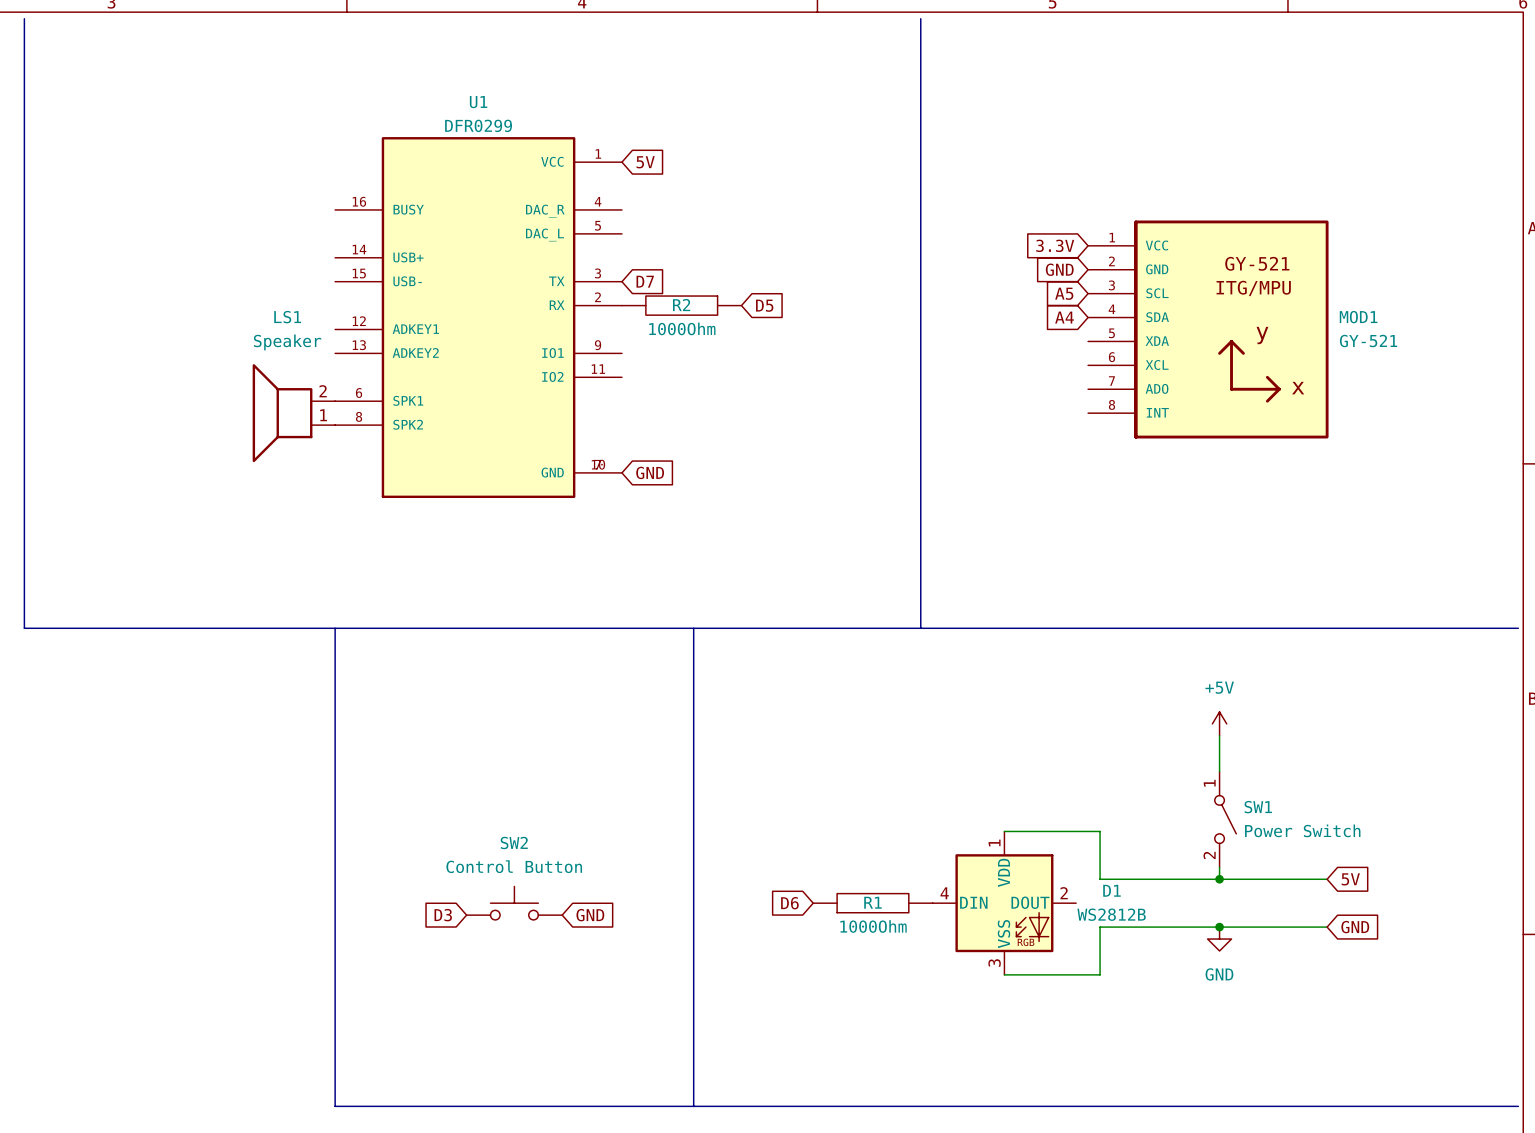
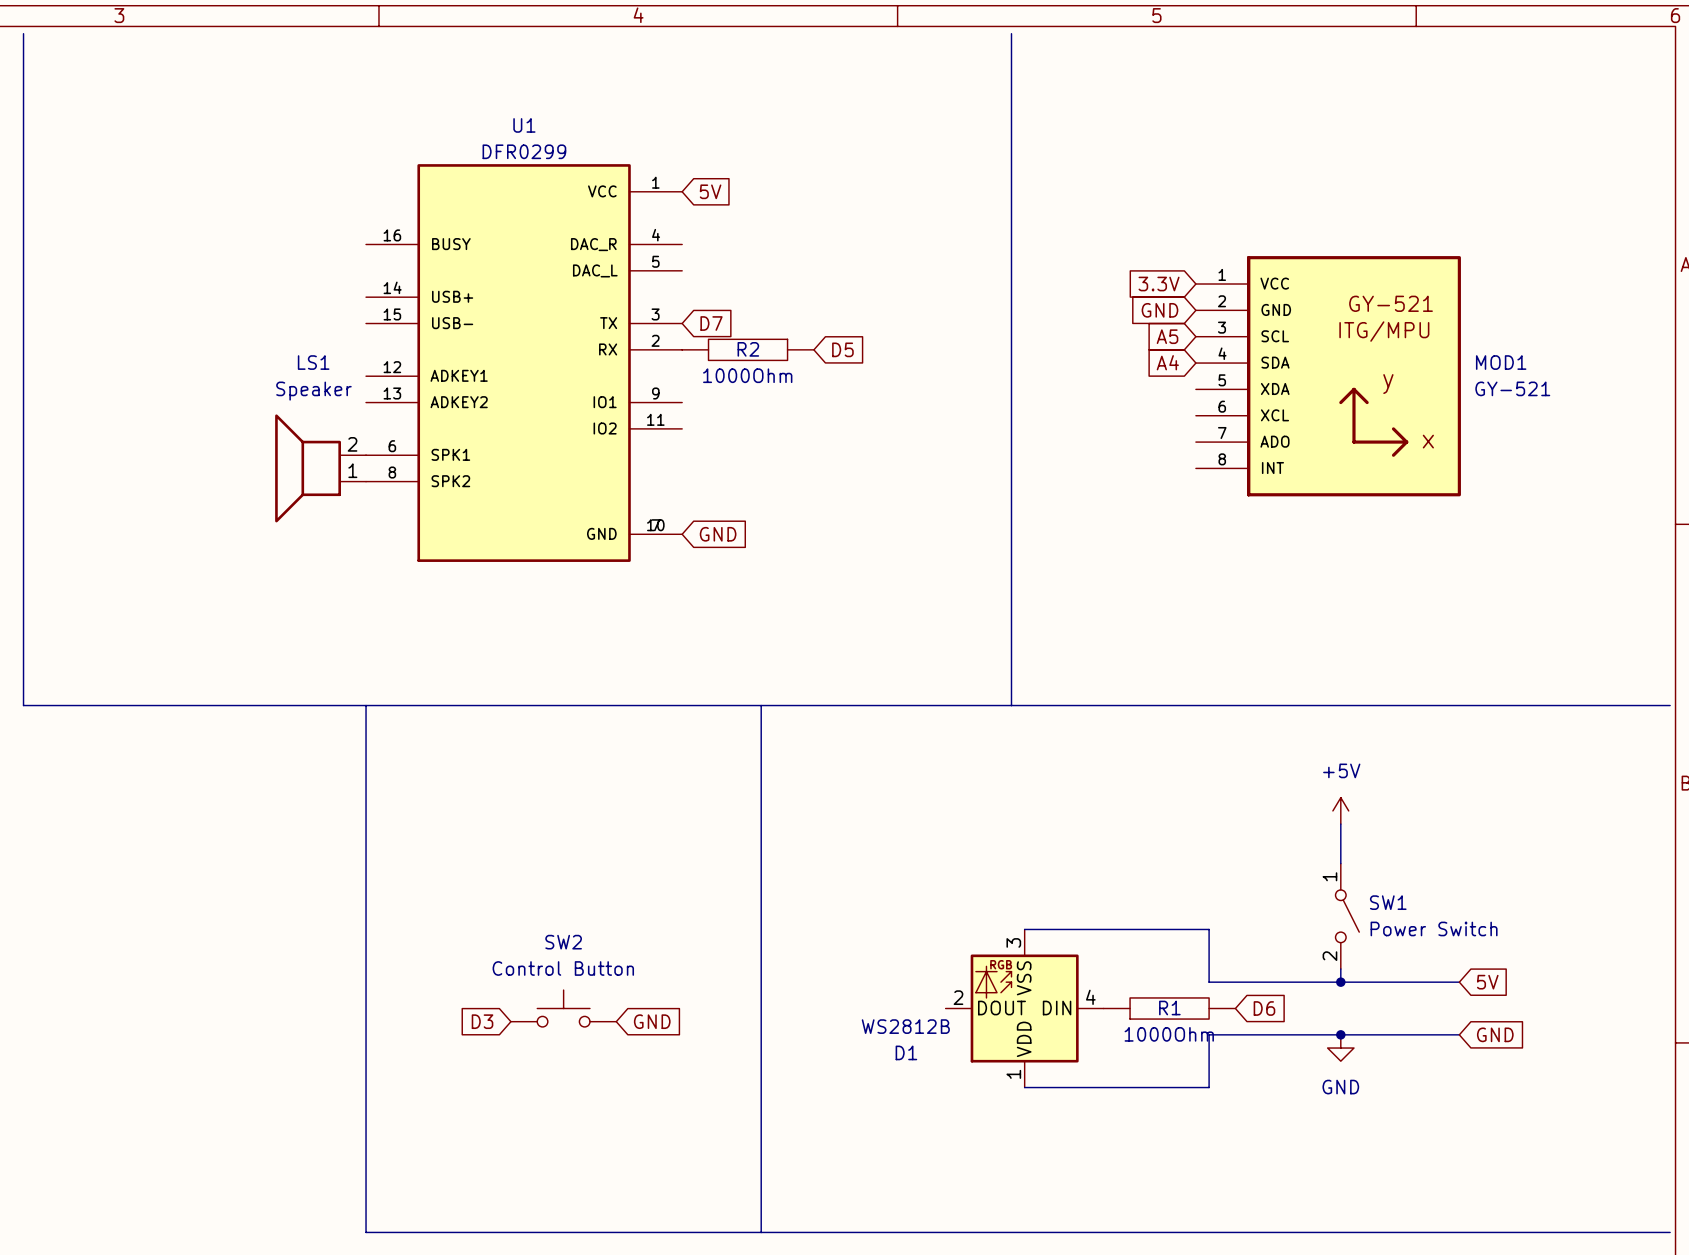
wire: none -> (1024, 929) (1103, 929)
D1 name position: D1 (1111, 890) -> D1 (906, 1052)
global label: D6 (789, 903) -> none
R1 position: (872, 903) -> (1169, 1008)
D1 rotation: 0° (1004, 903) -> 180° (1024, 1008)
global label: none -> D6 (1264, 1008)
D1 value position: WS2812B (1111, 914) -> WS2812B (905, 1026)
wire: none -> (1024, 1087) (1103, 1087)

